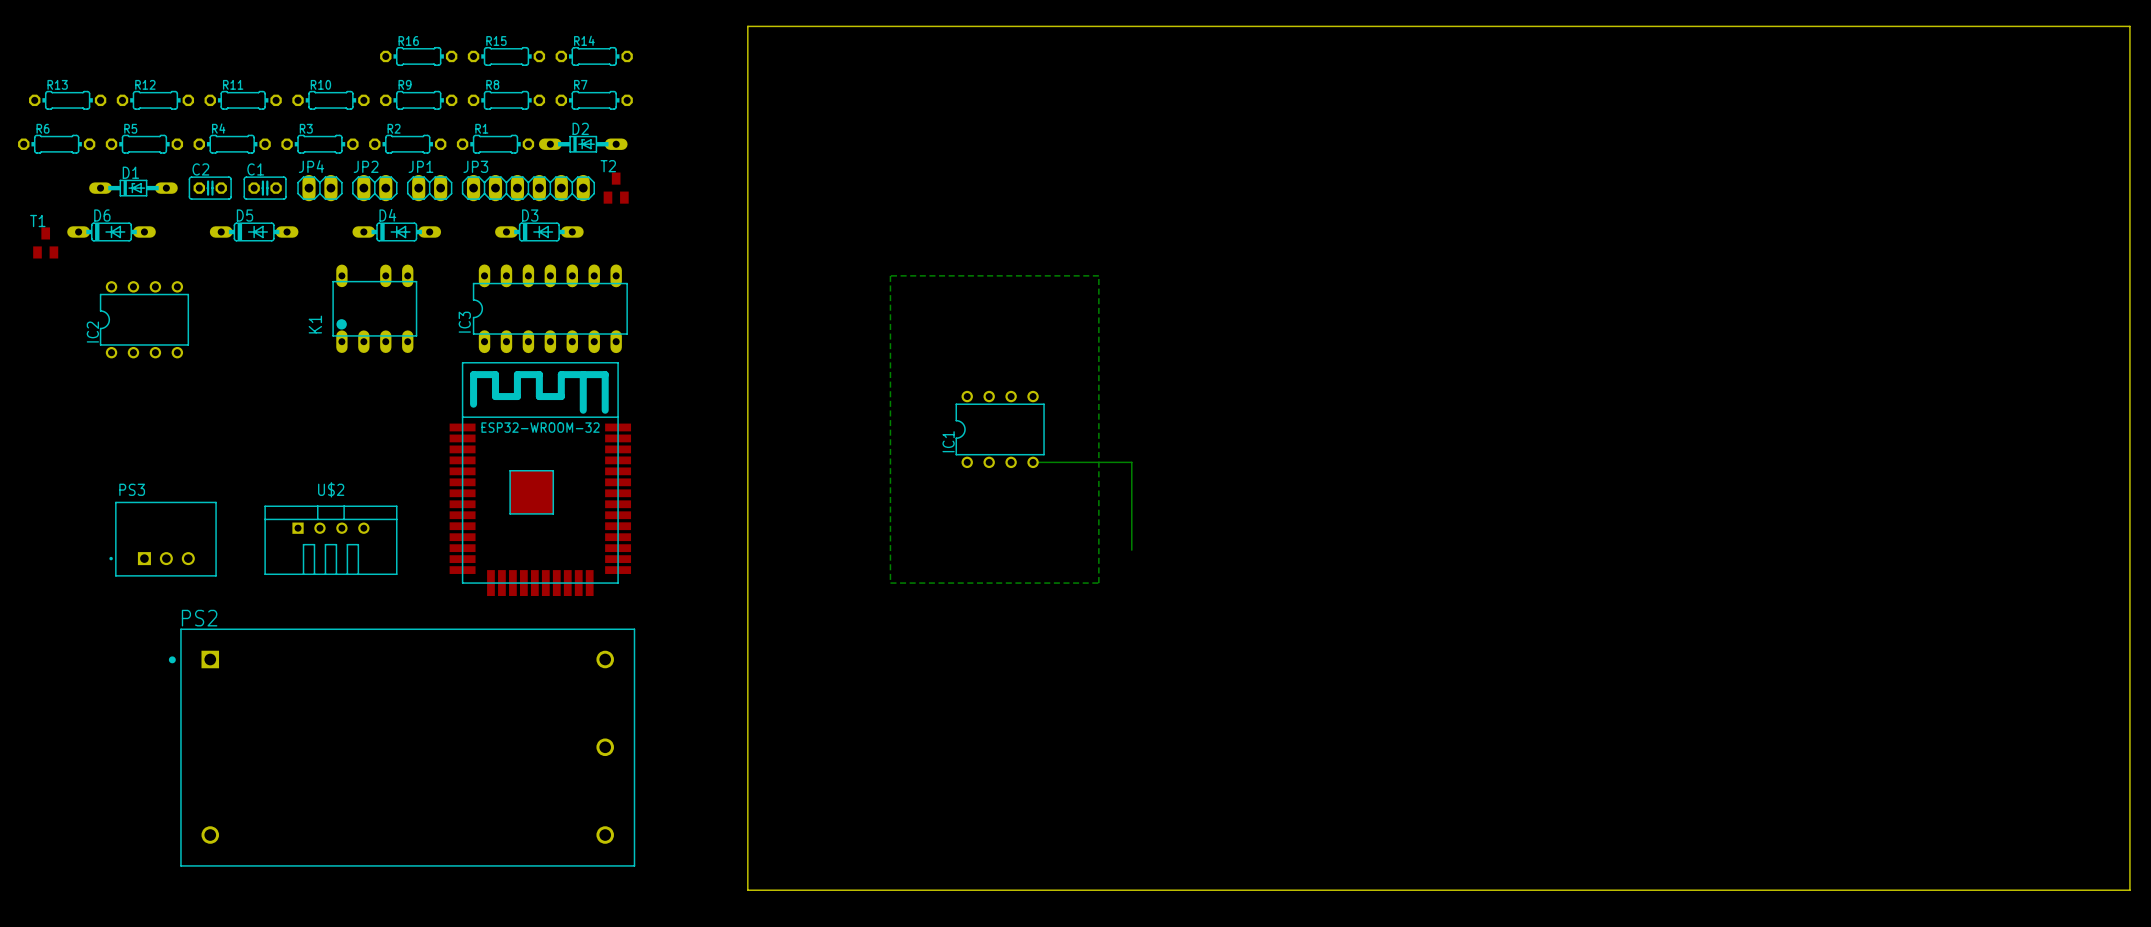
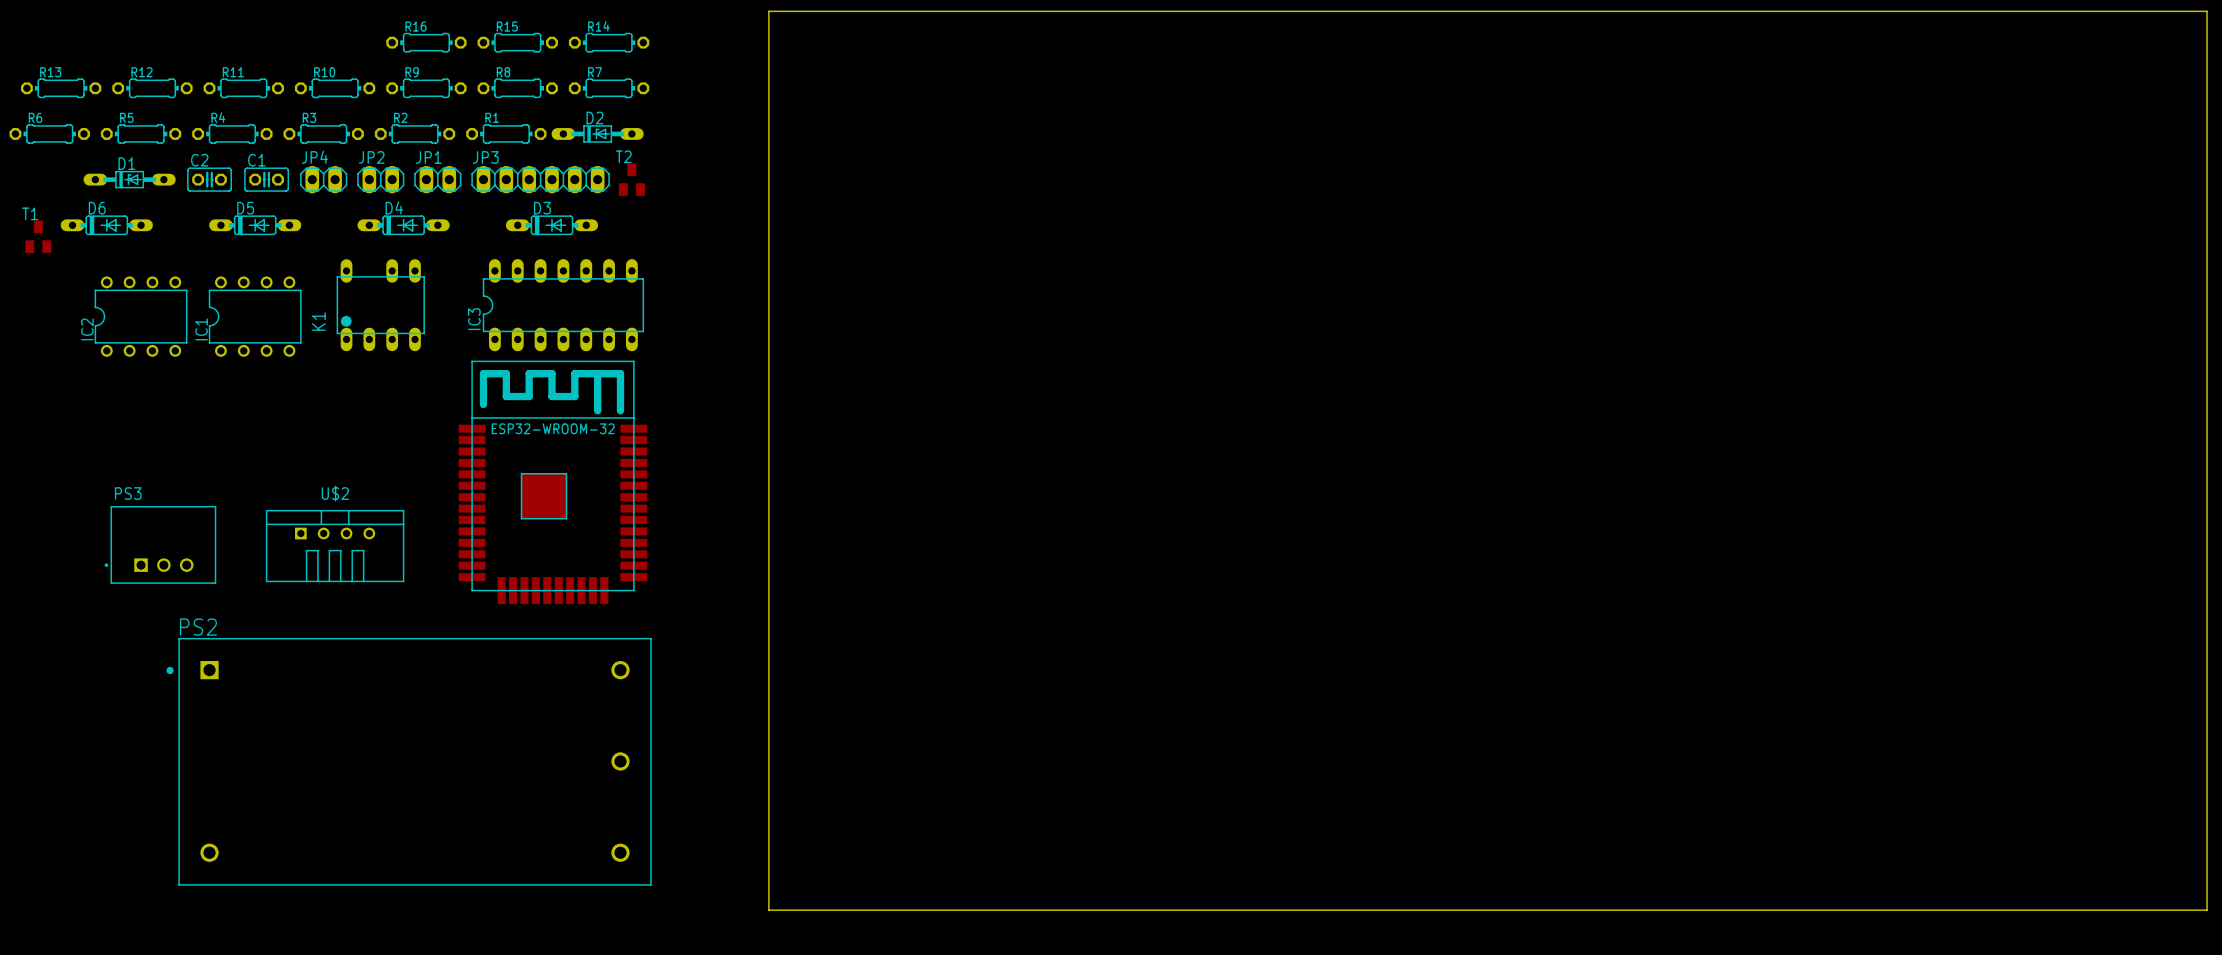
bottom zone outline: (890, 275) (890, 583) (1098, 583) (1098, 275) (890, 275) -> none
IC1 position: (1000, 429) -> (255, 316)
bottom track: (1033, 462) (1131, 462) (1131, 550) -> none

